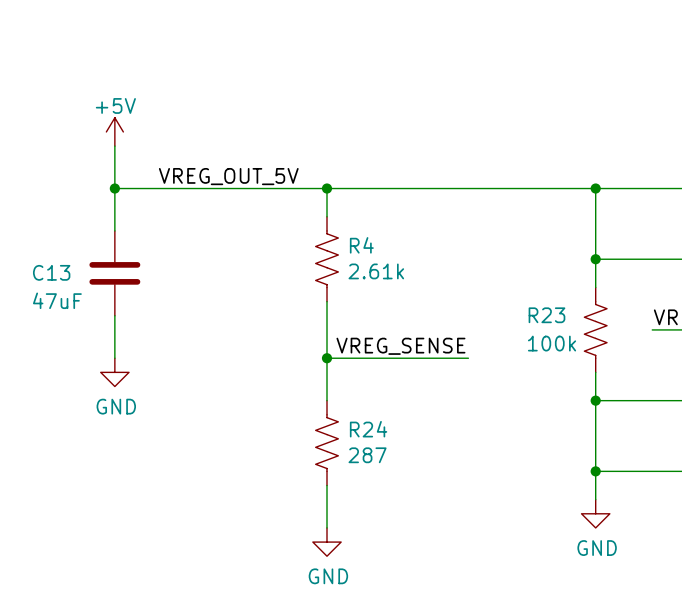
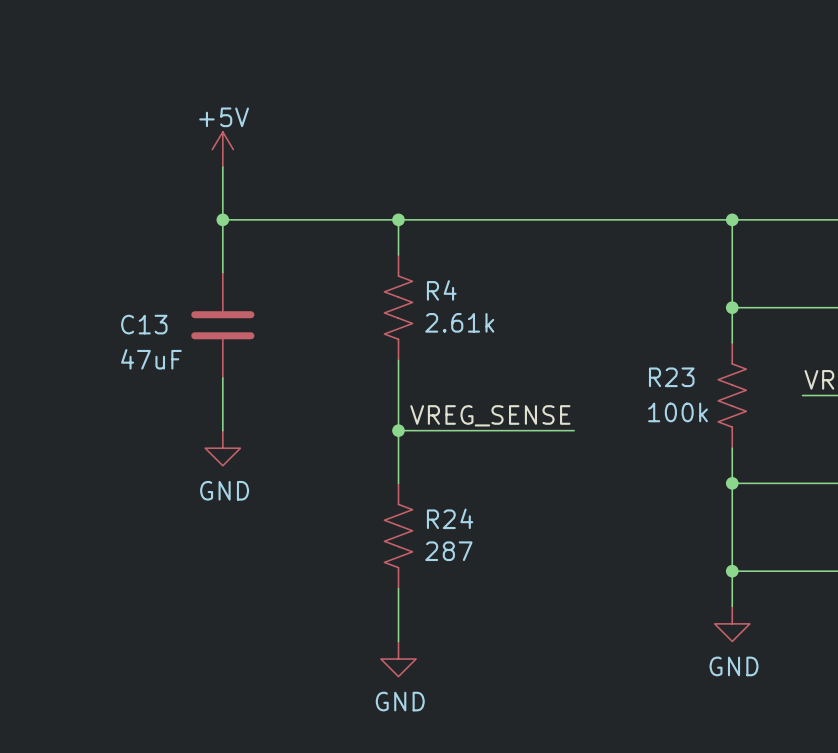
power symbol position: +5V (114, 131) -> +5V (222, 149)
wire: (114, 146) (114, 230) -> (222, 167) (222, 272)
label: VREG_OUT_5V (228, 176) -> none
wire: (114, 188) (185, 188) -> none
junction: (114, 188) -> none
junction: none -> (222, 219)
C13 position: (114, 273) -> (222, 325)
wire: (114, 315) (114, 358) -> (222, 377) (222, 430)
power symbol position: GND (114, 372) -> GND (222, 448)

